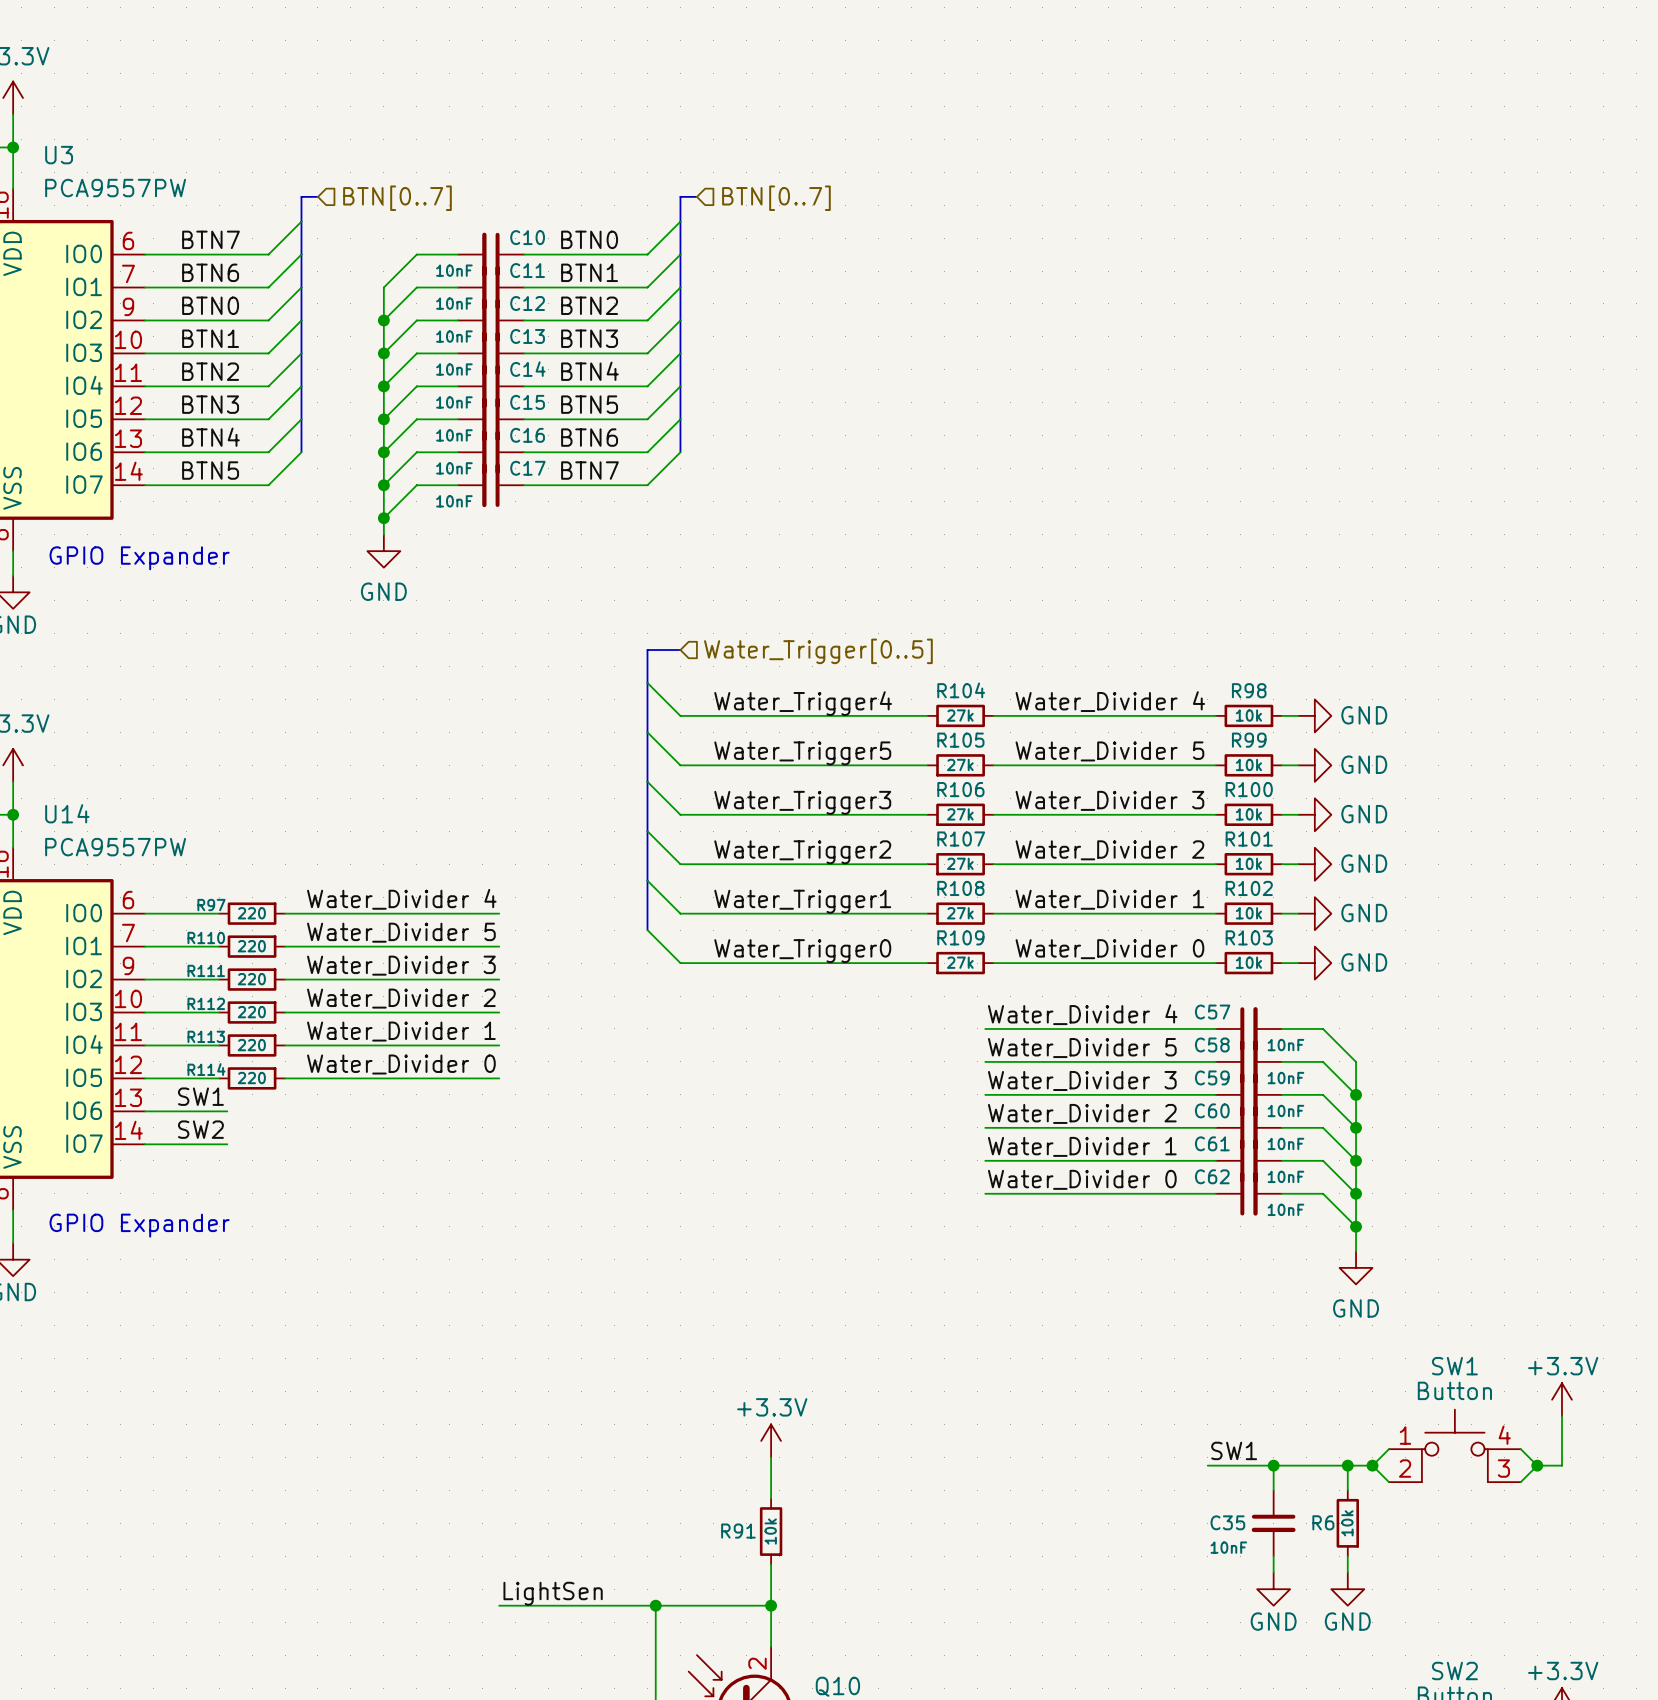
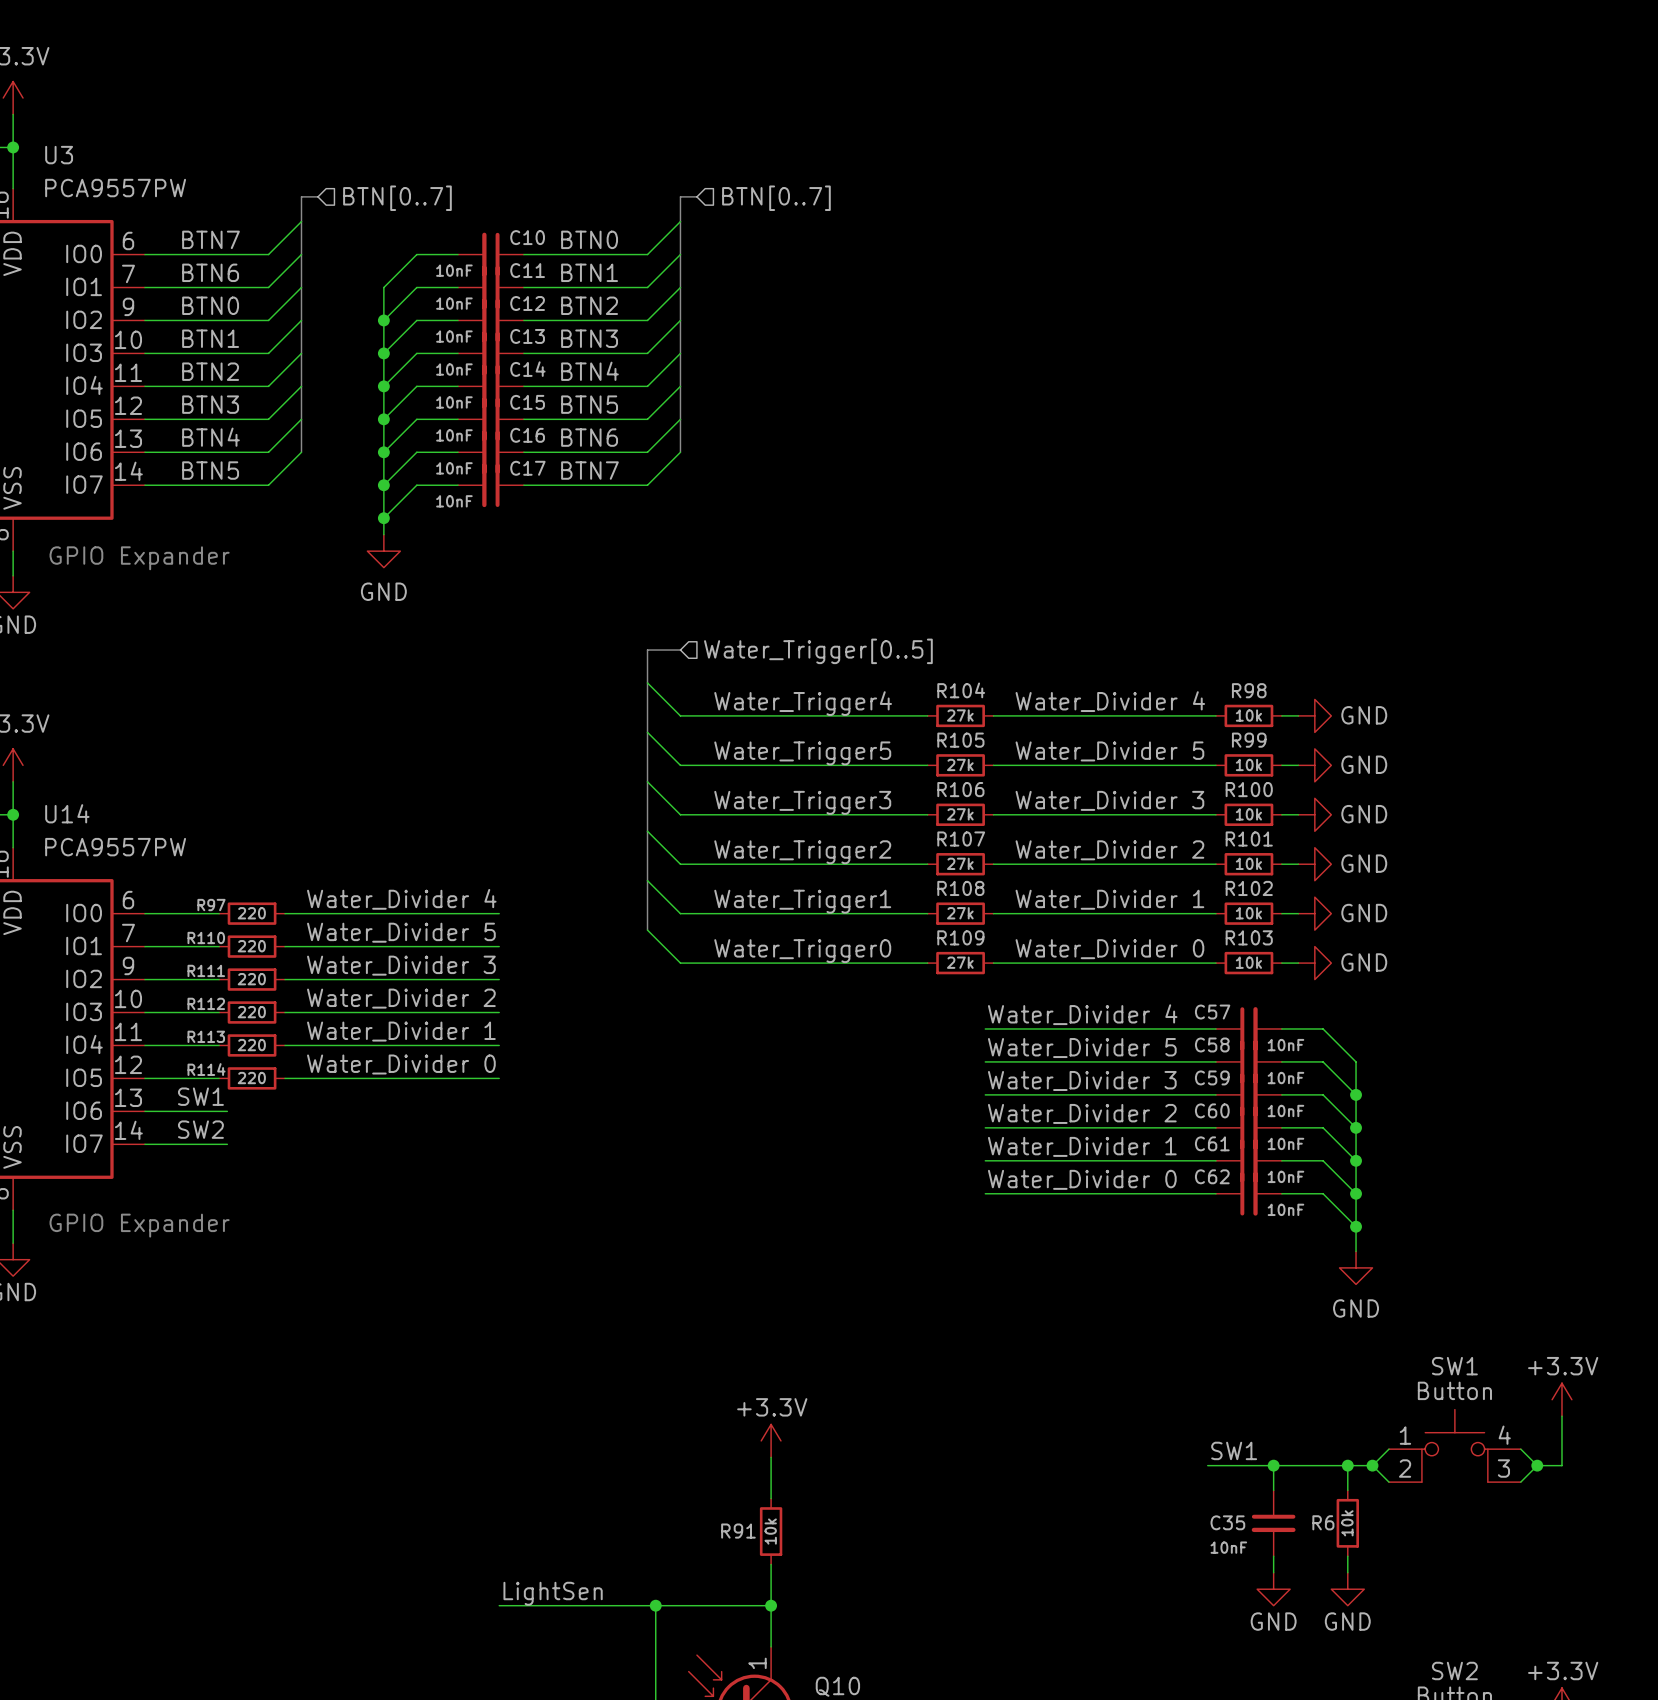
Q10 pin number: 2 (757, 1663) -> 1 (757, 1663)

